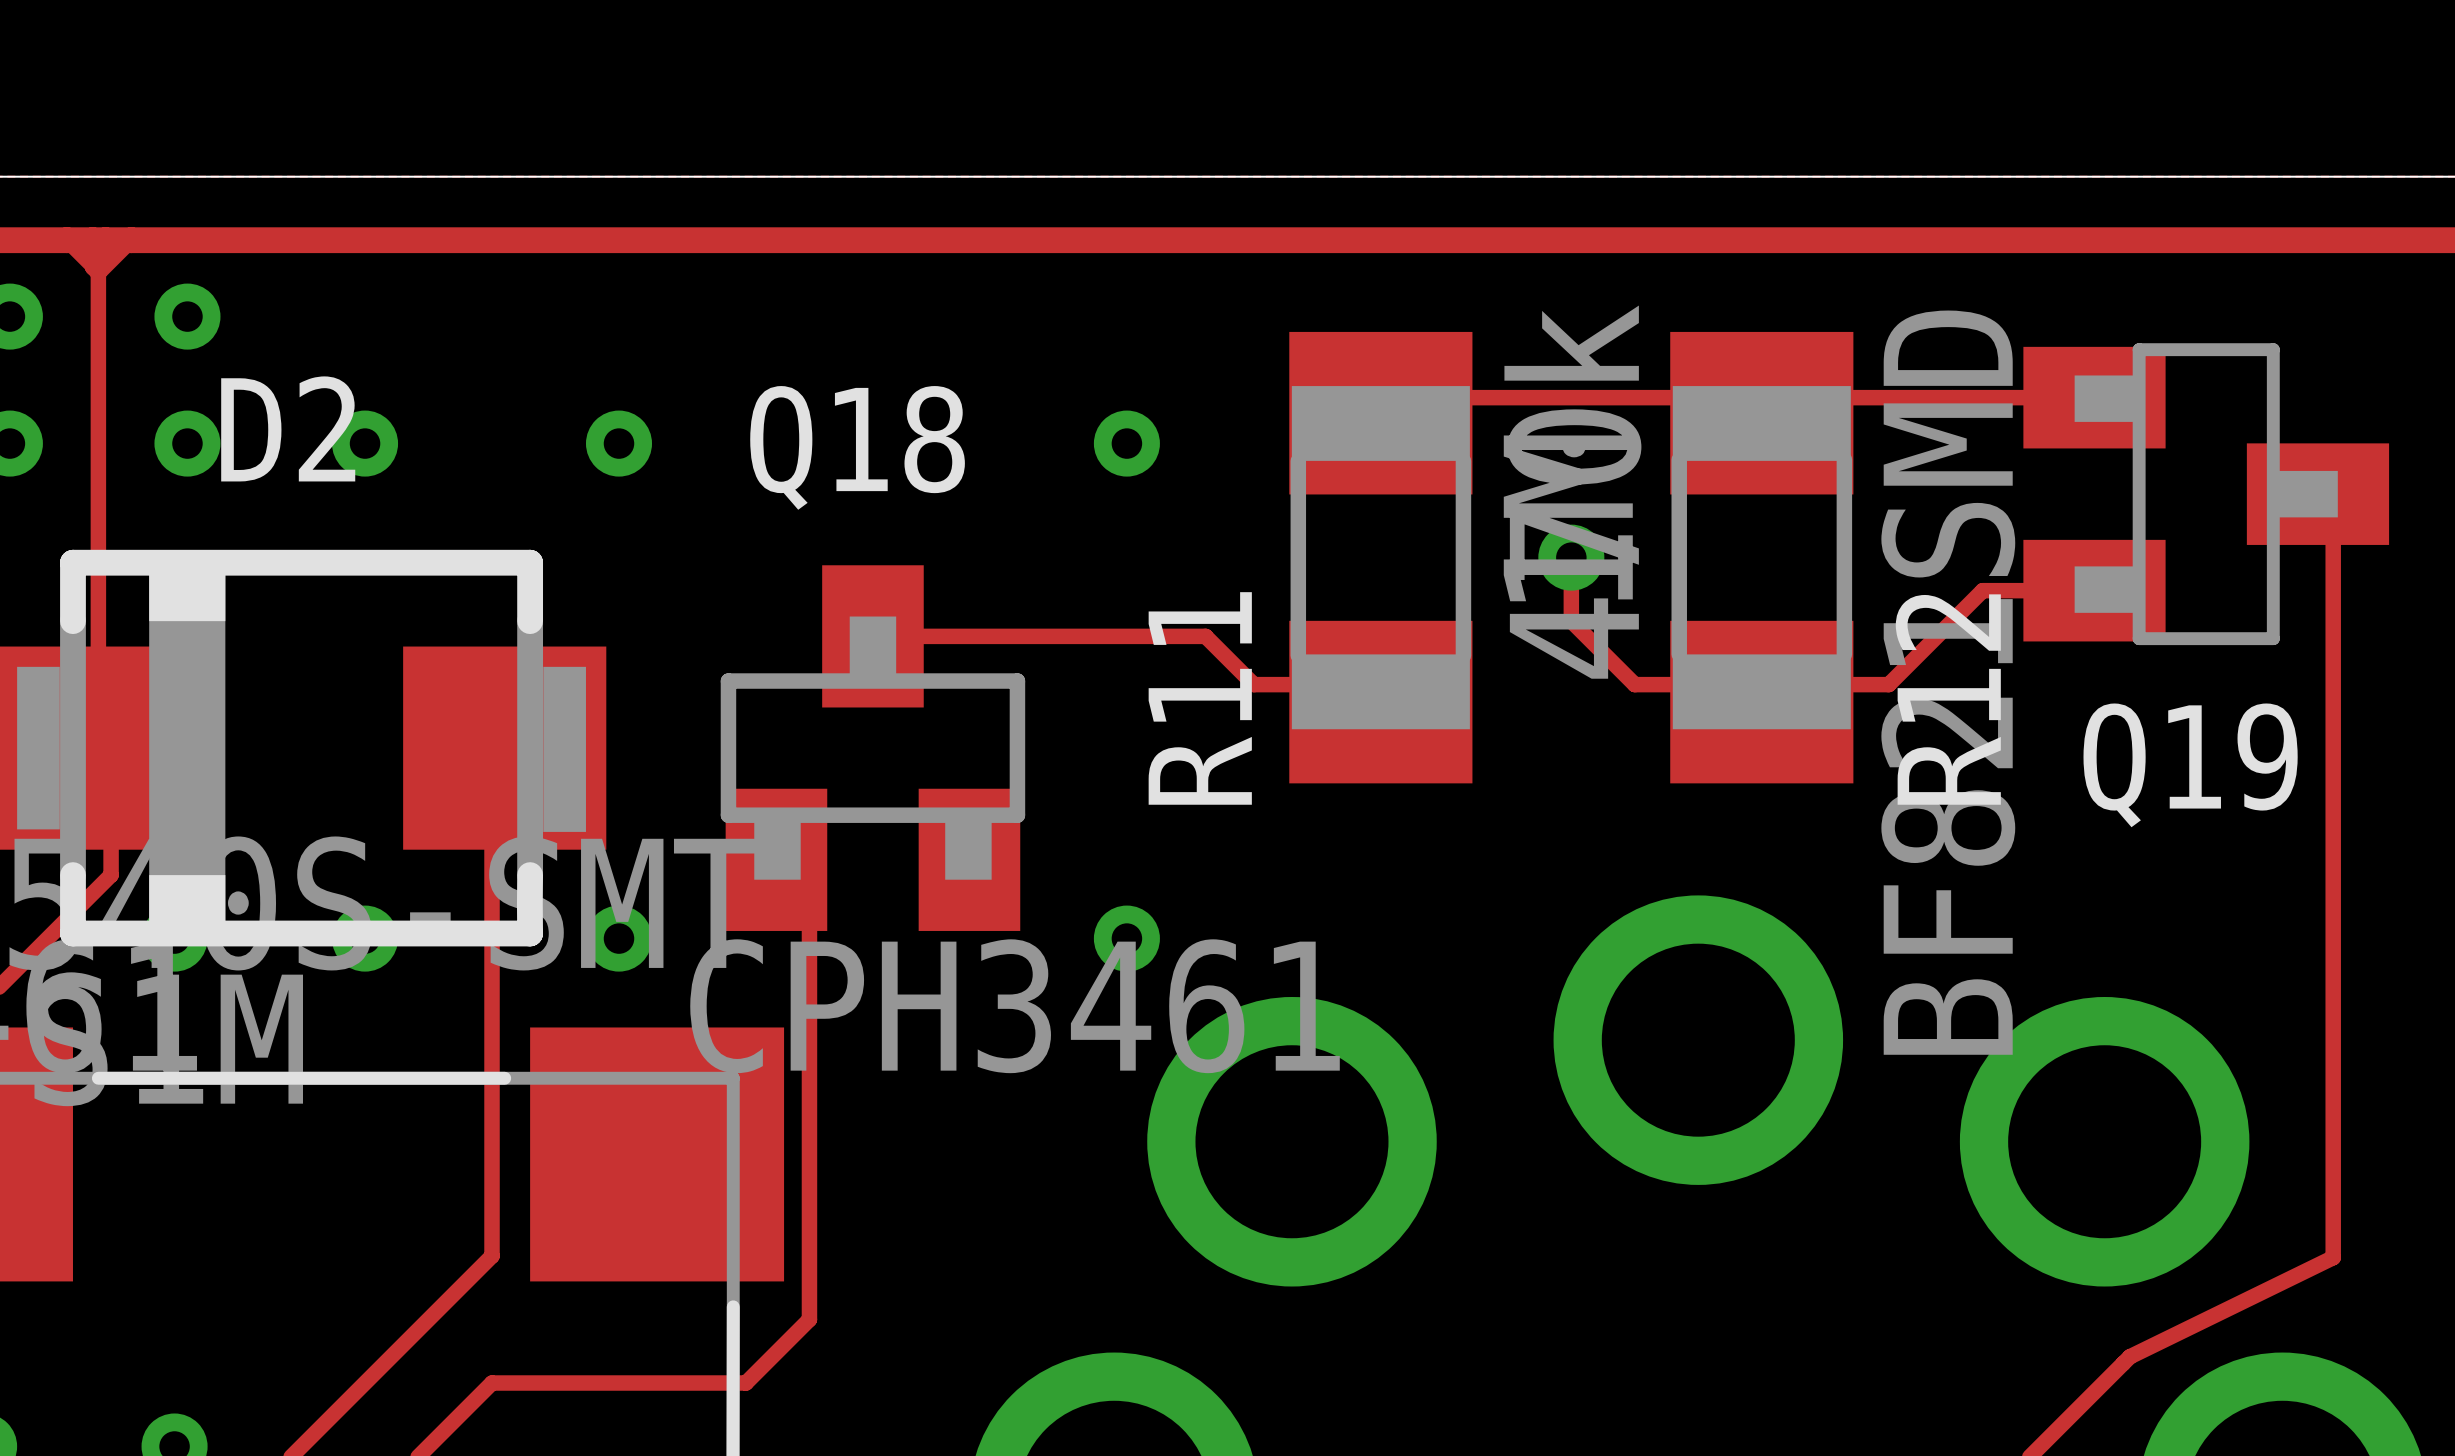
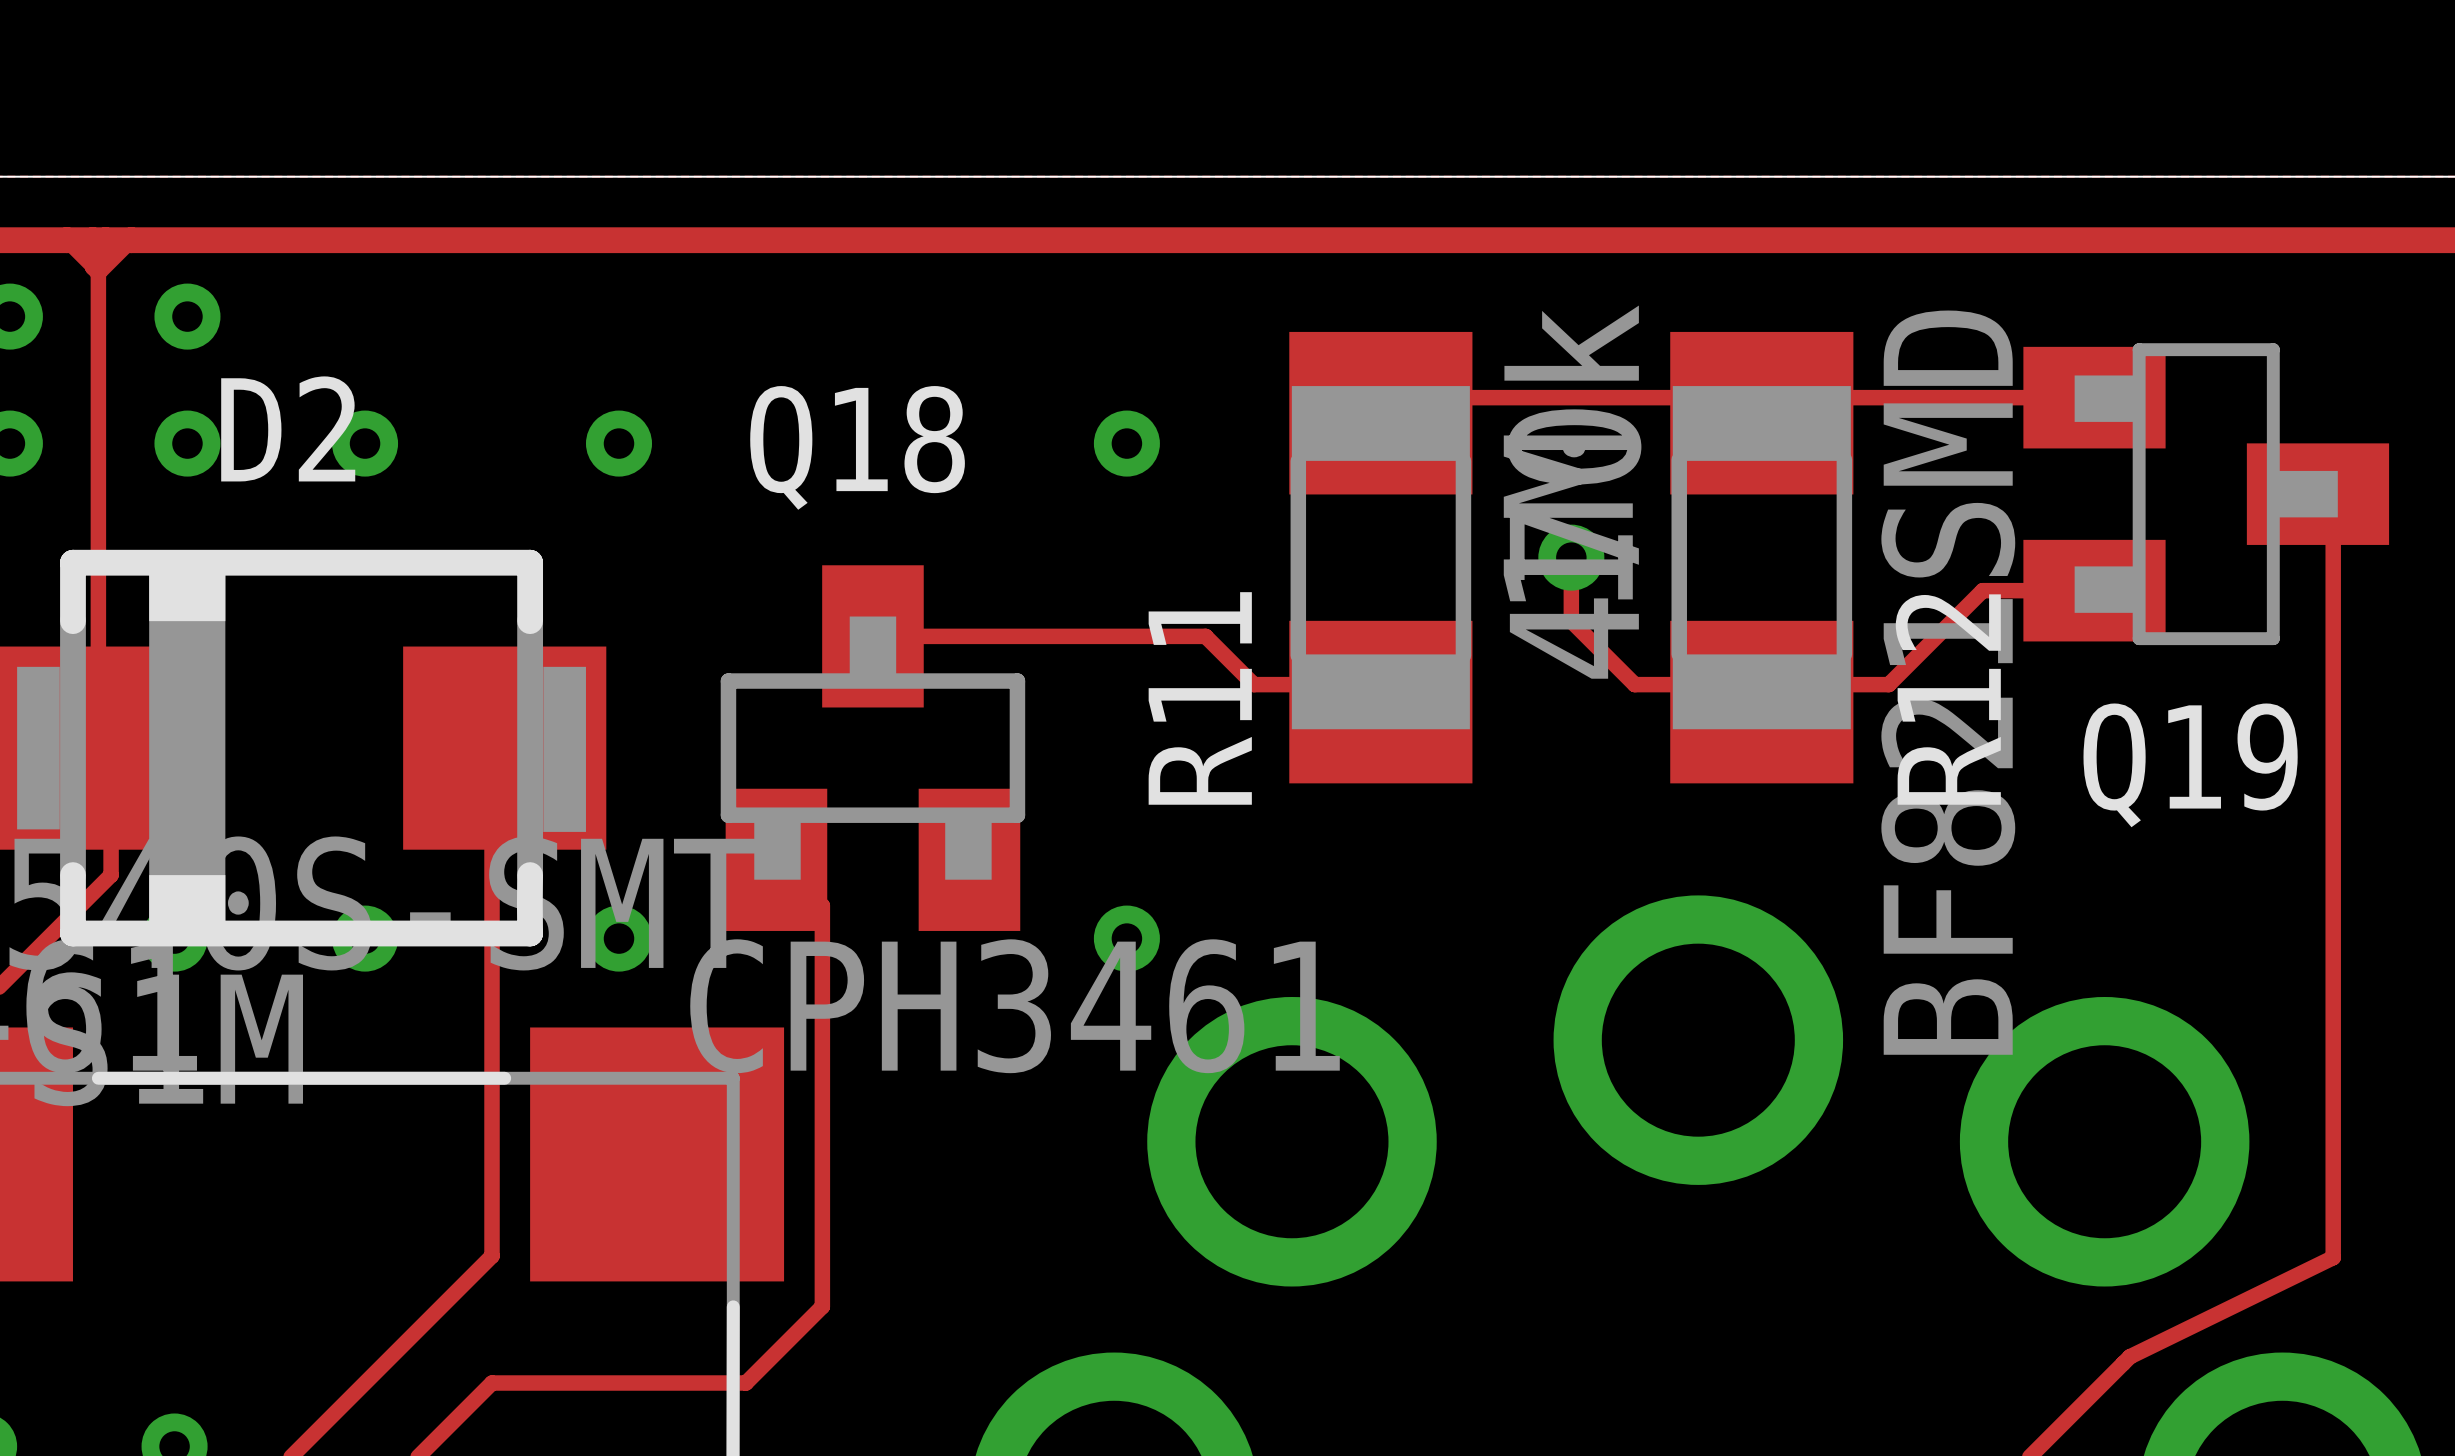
track: (809, 892) (809, 1319) -> (809, 892) (822, 905) (822, 1306) (809, 1319)

